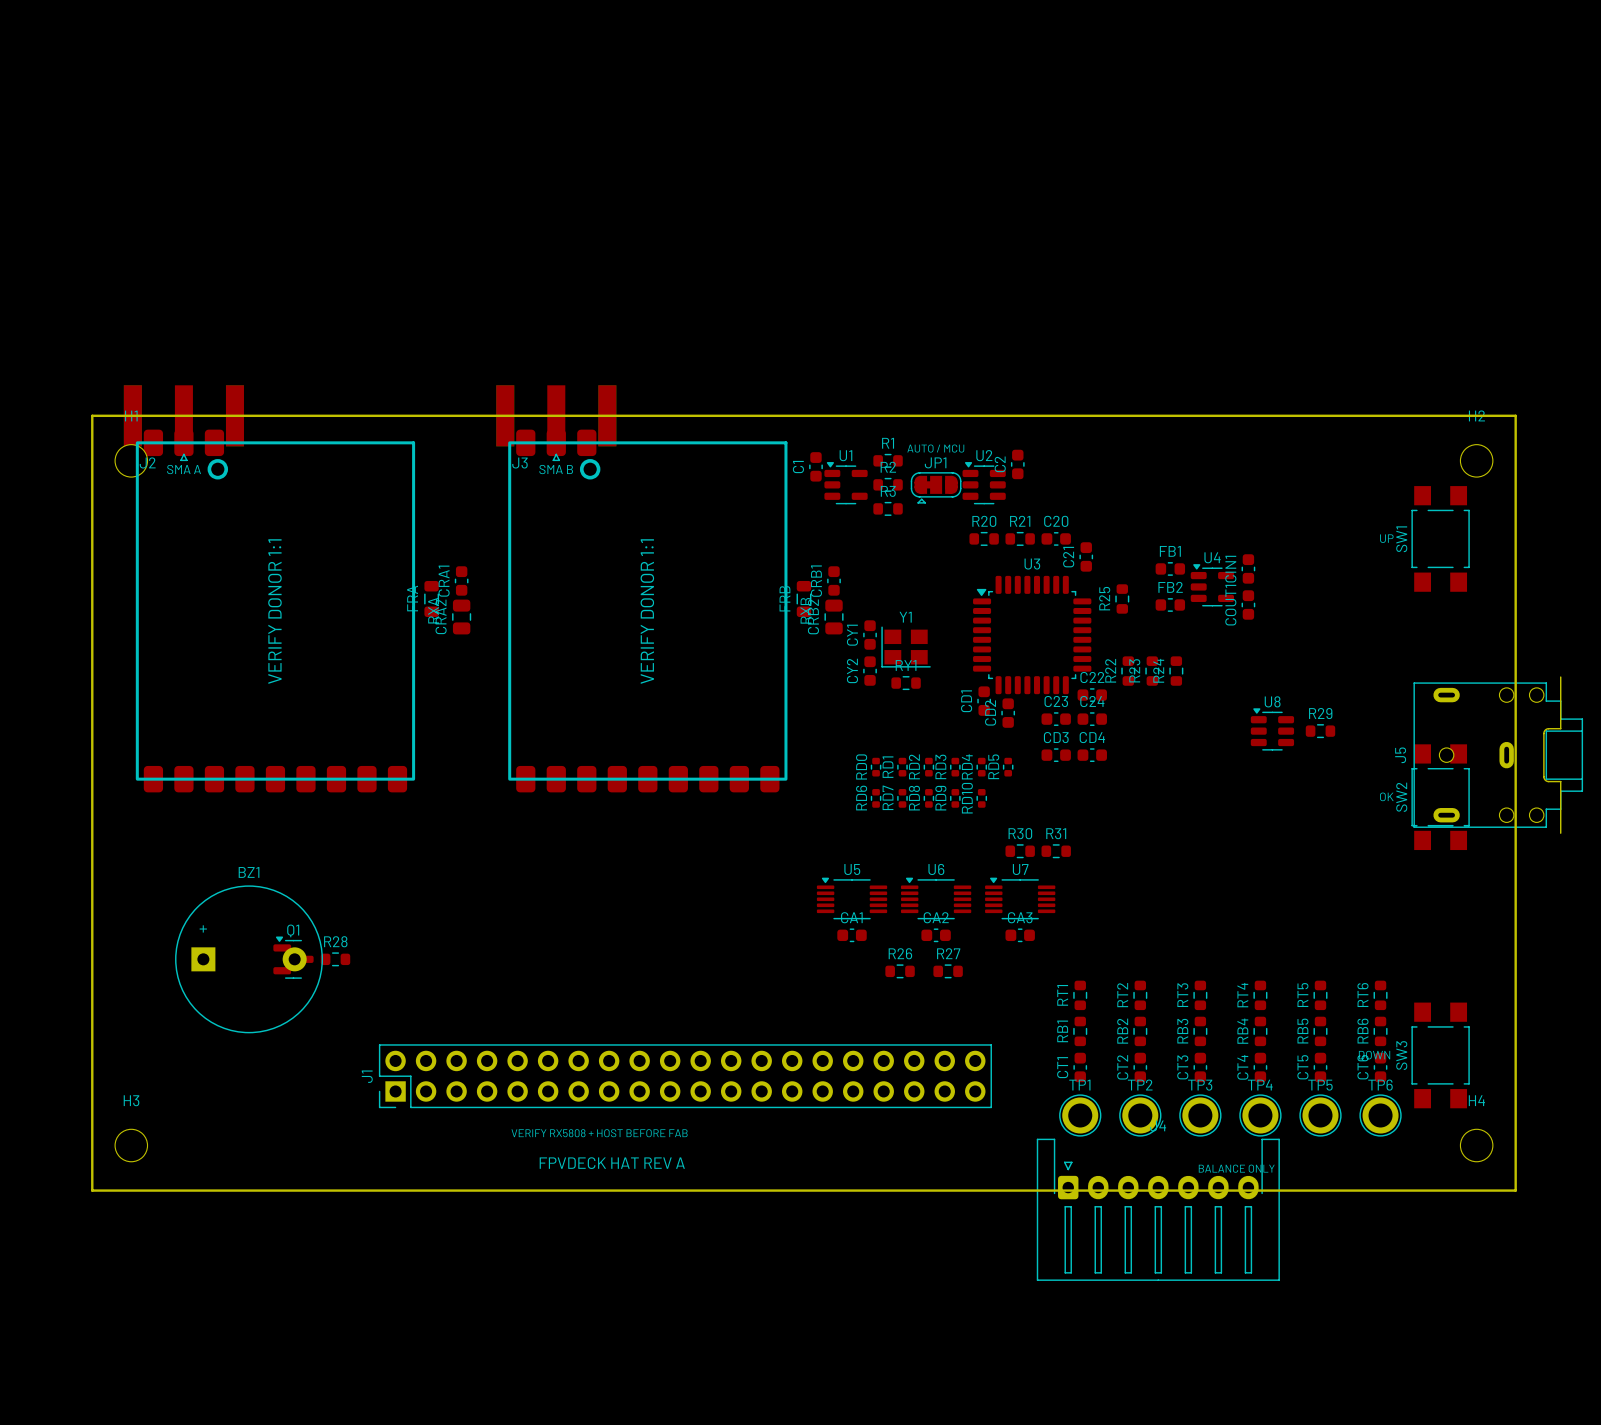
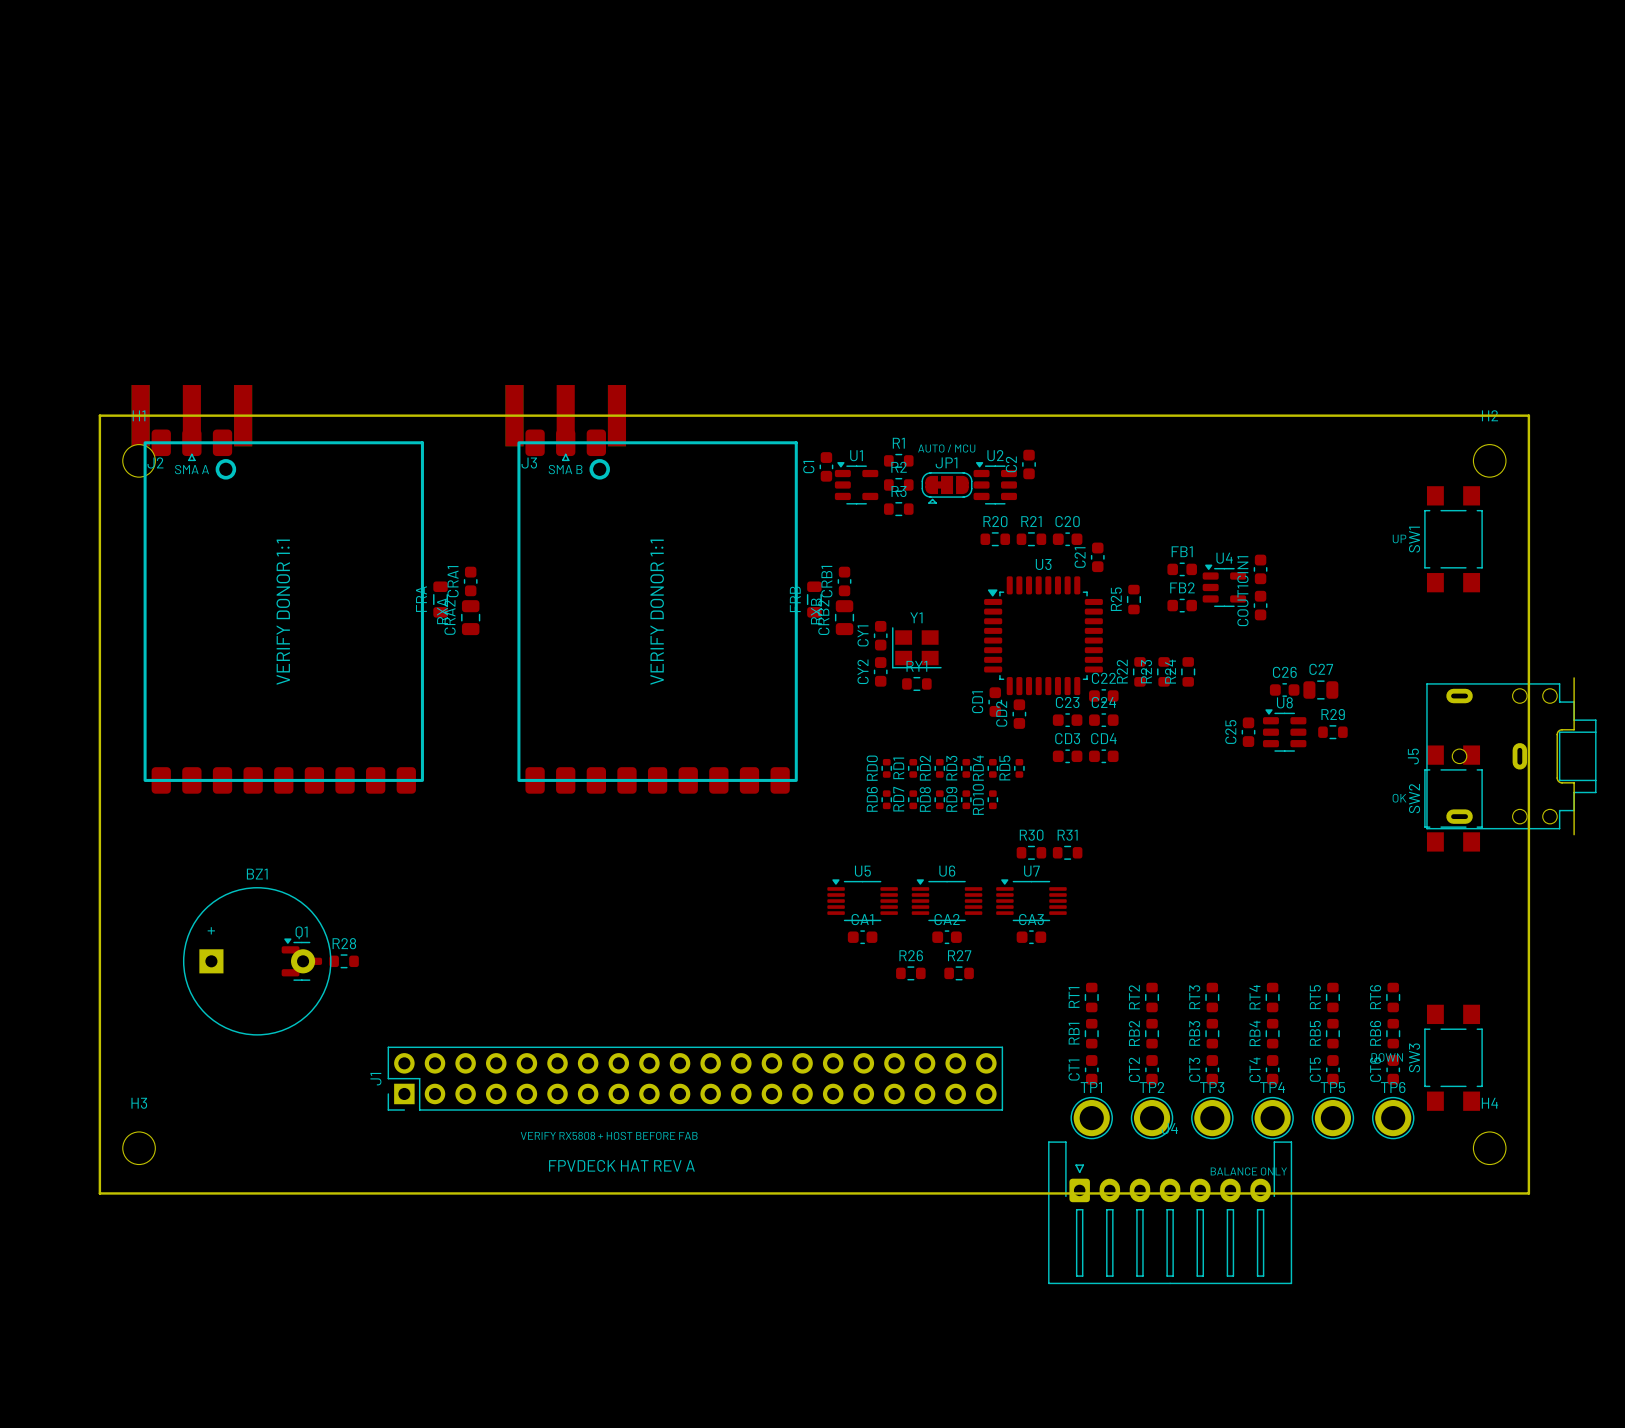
C26: none -> (1284, 689)
C27: none -> (1320, 689)
C25: none -> (1248, 732)

